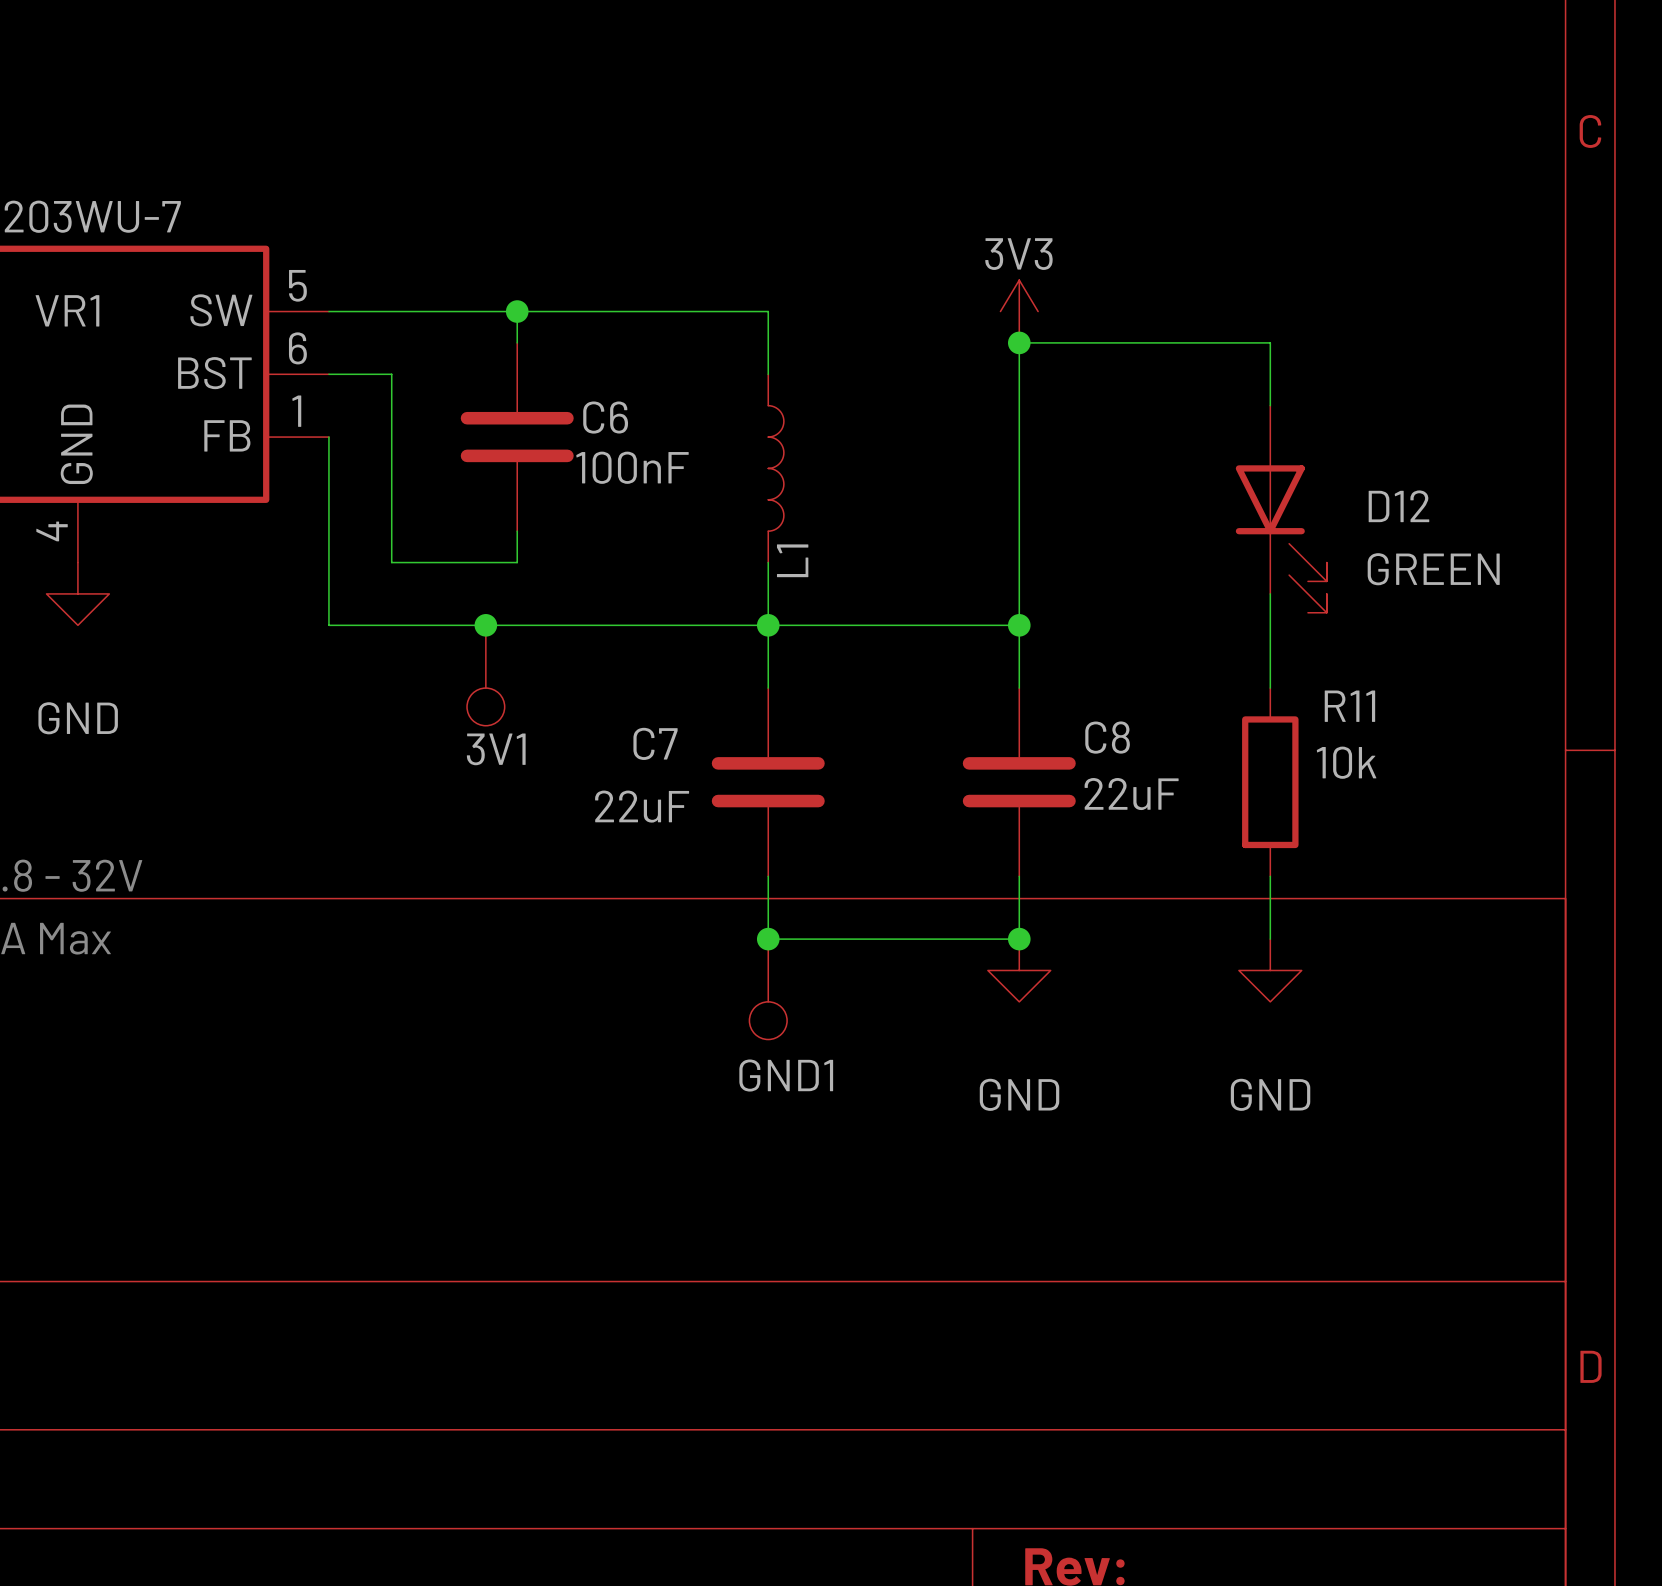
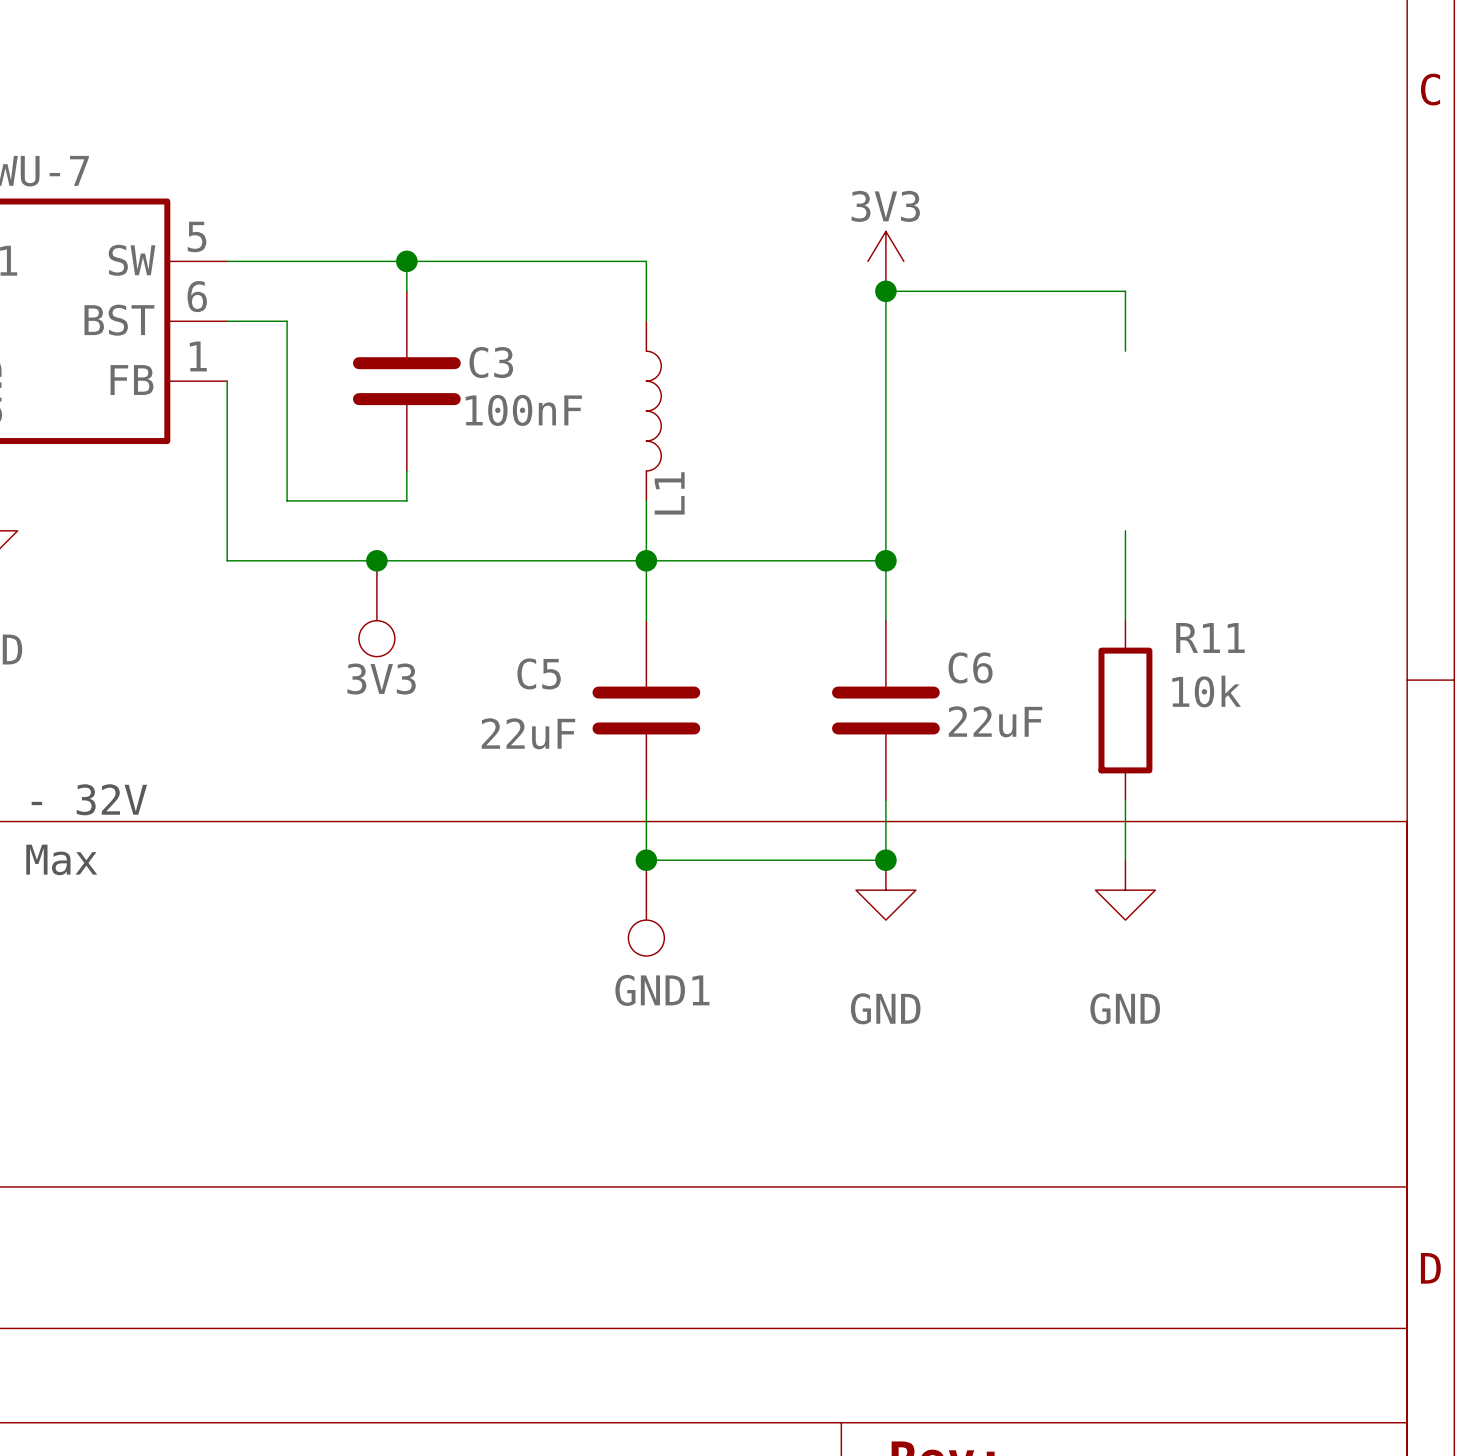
C6 name: C6 (605, 417) -> C3 (491, 362)
D12: GREEN (1281, 509) -> none
C8 name: C8 (1107, 737) -> C6 (970, 667)
C7 name: C7 (655, 743) -> C5 (539, 673)
3V1 name: 3V1 (496, 749) -> 3V3 (381, 679)

